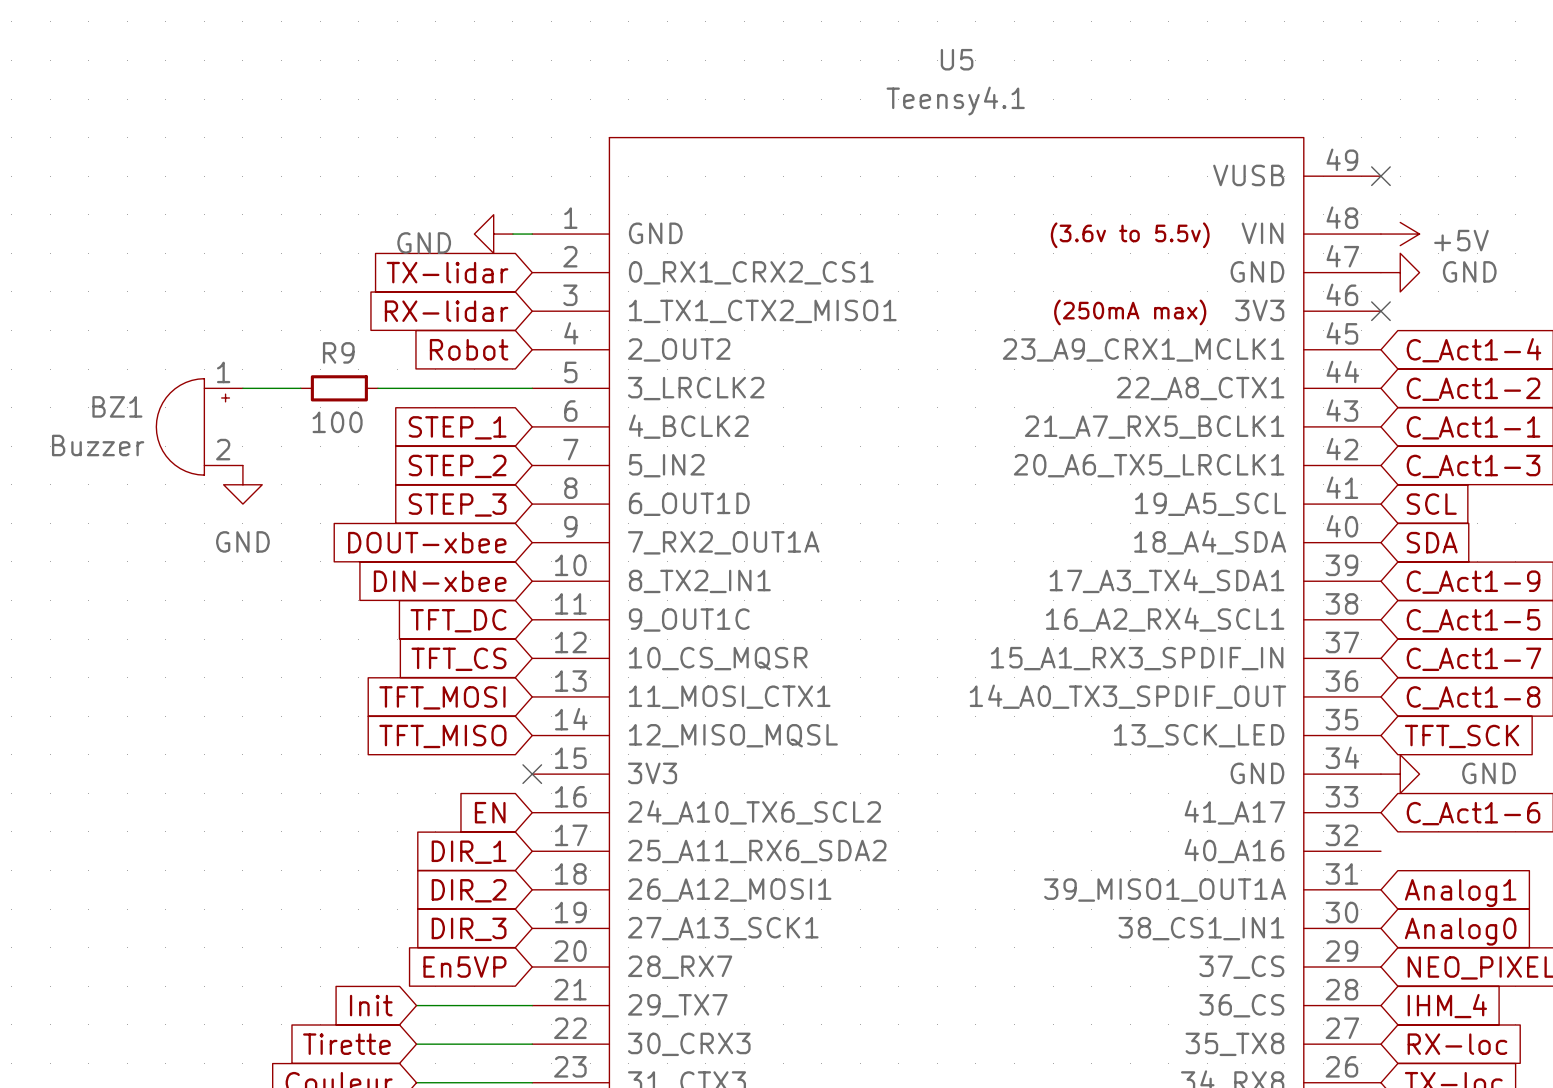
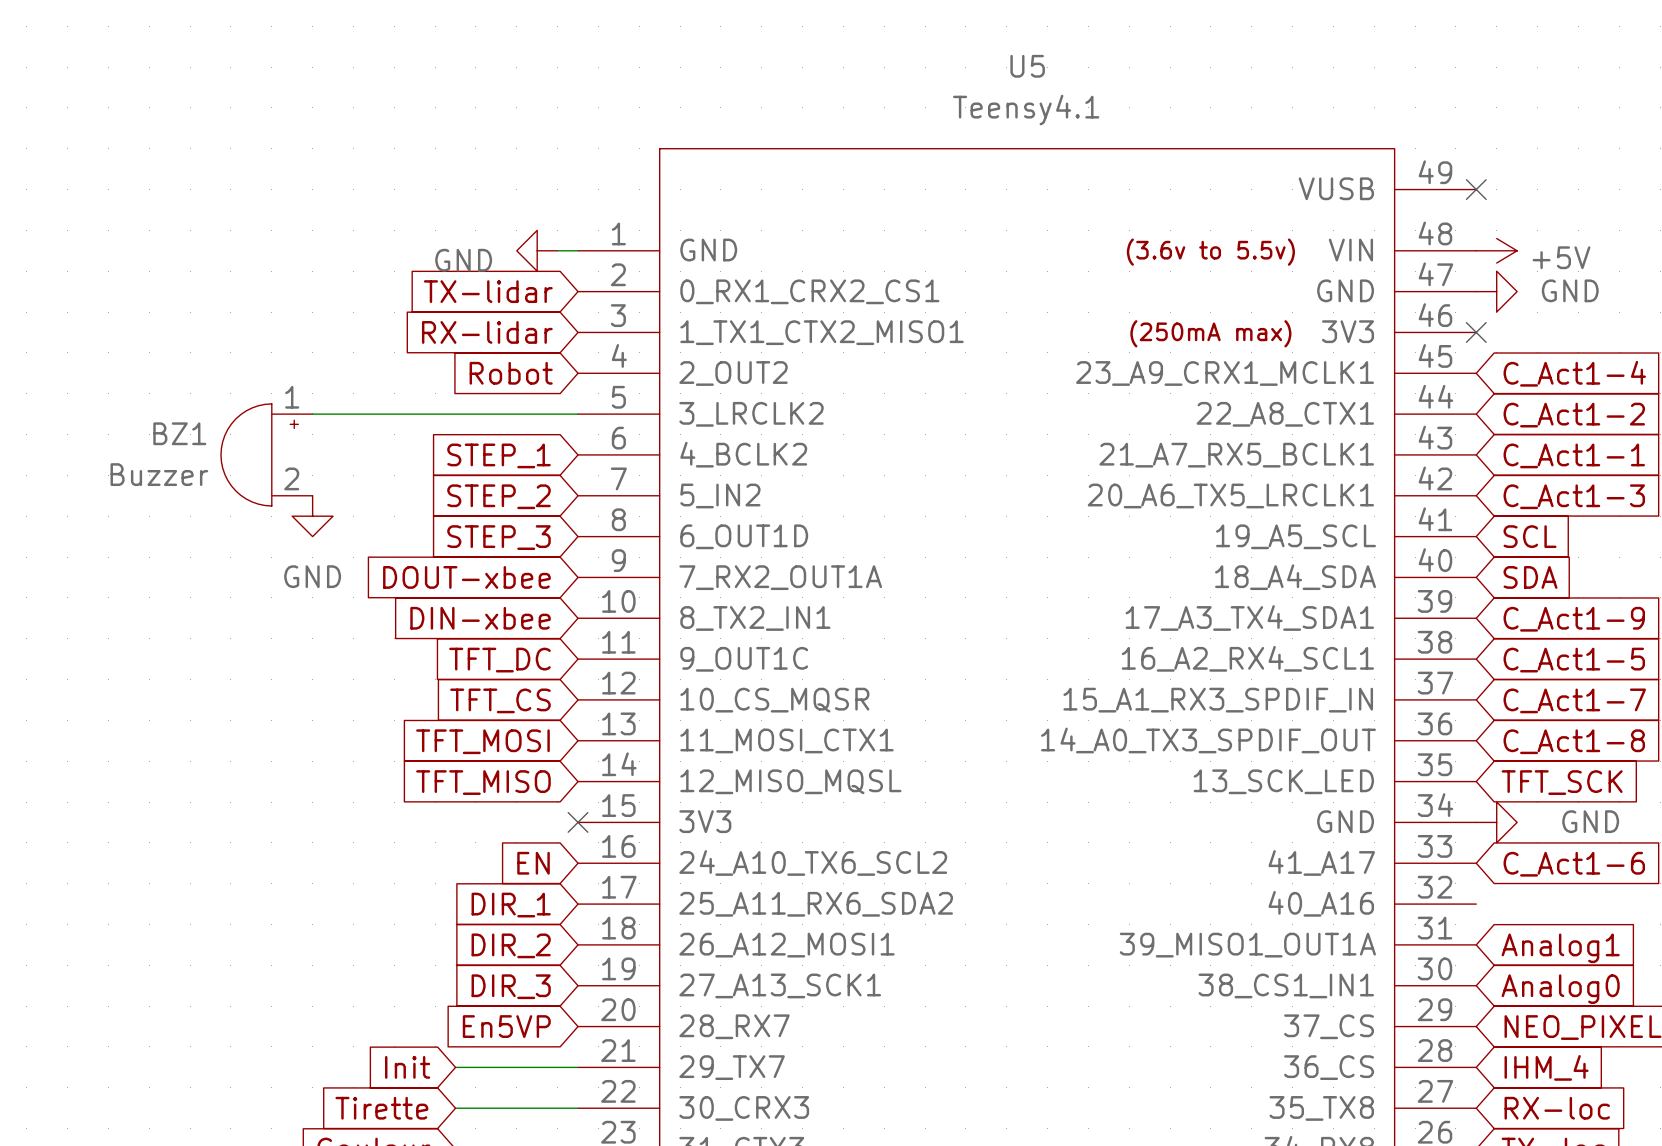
wire: none -> (333, 414) (414, 414)
R9: 100 (339, 388) -> none
BZ1 position: (199, 426) -> (266, 454)
power symbol position: GND (242, 484) -> GND (312, 516)

